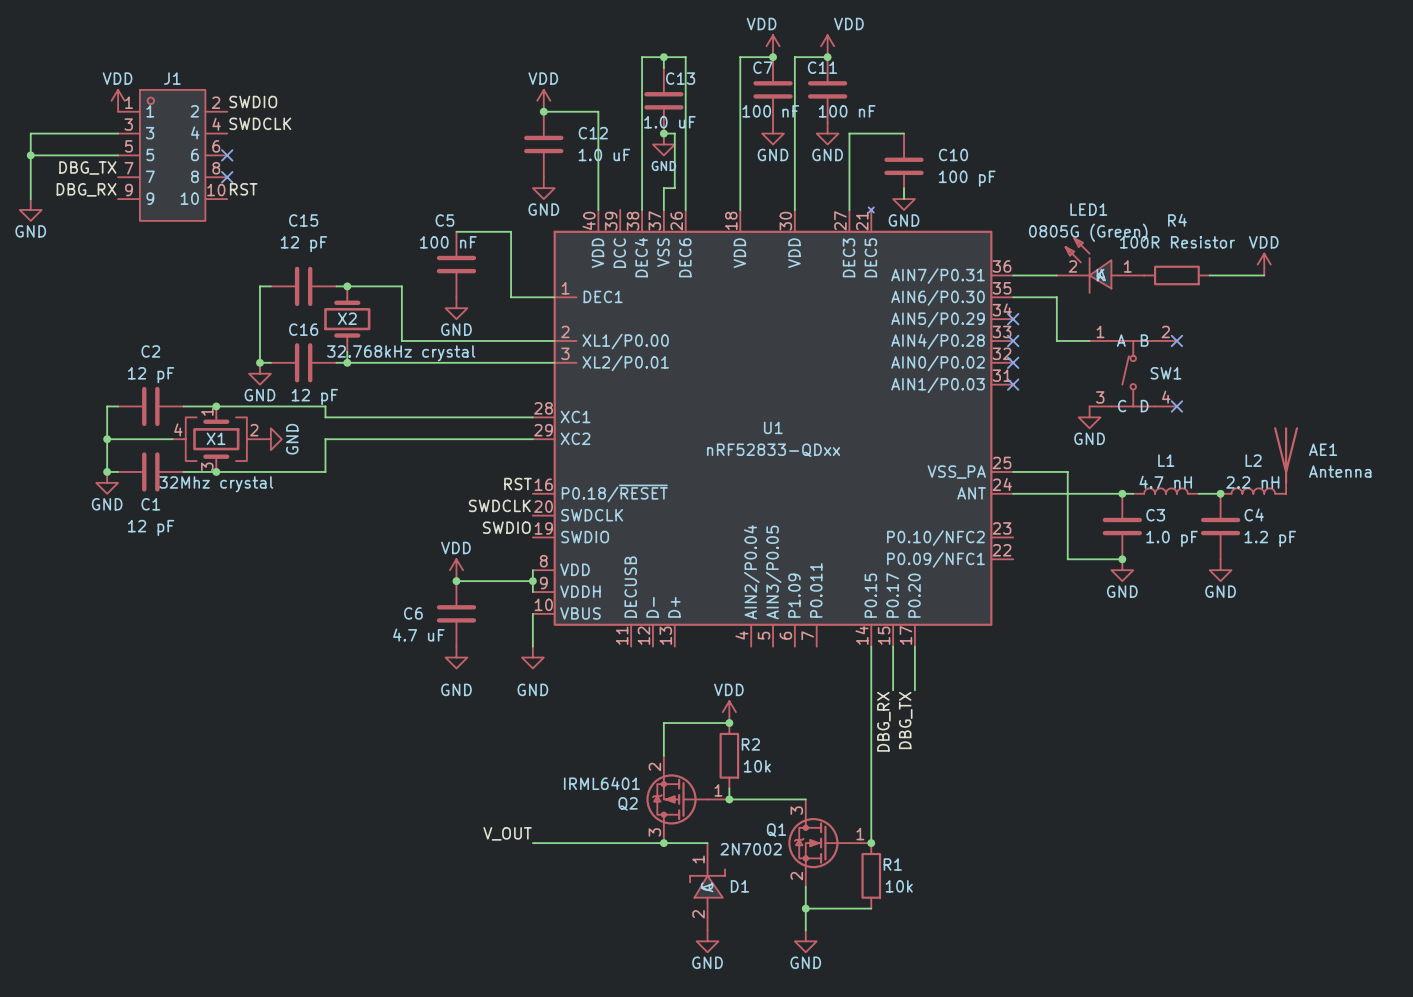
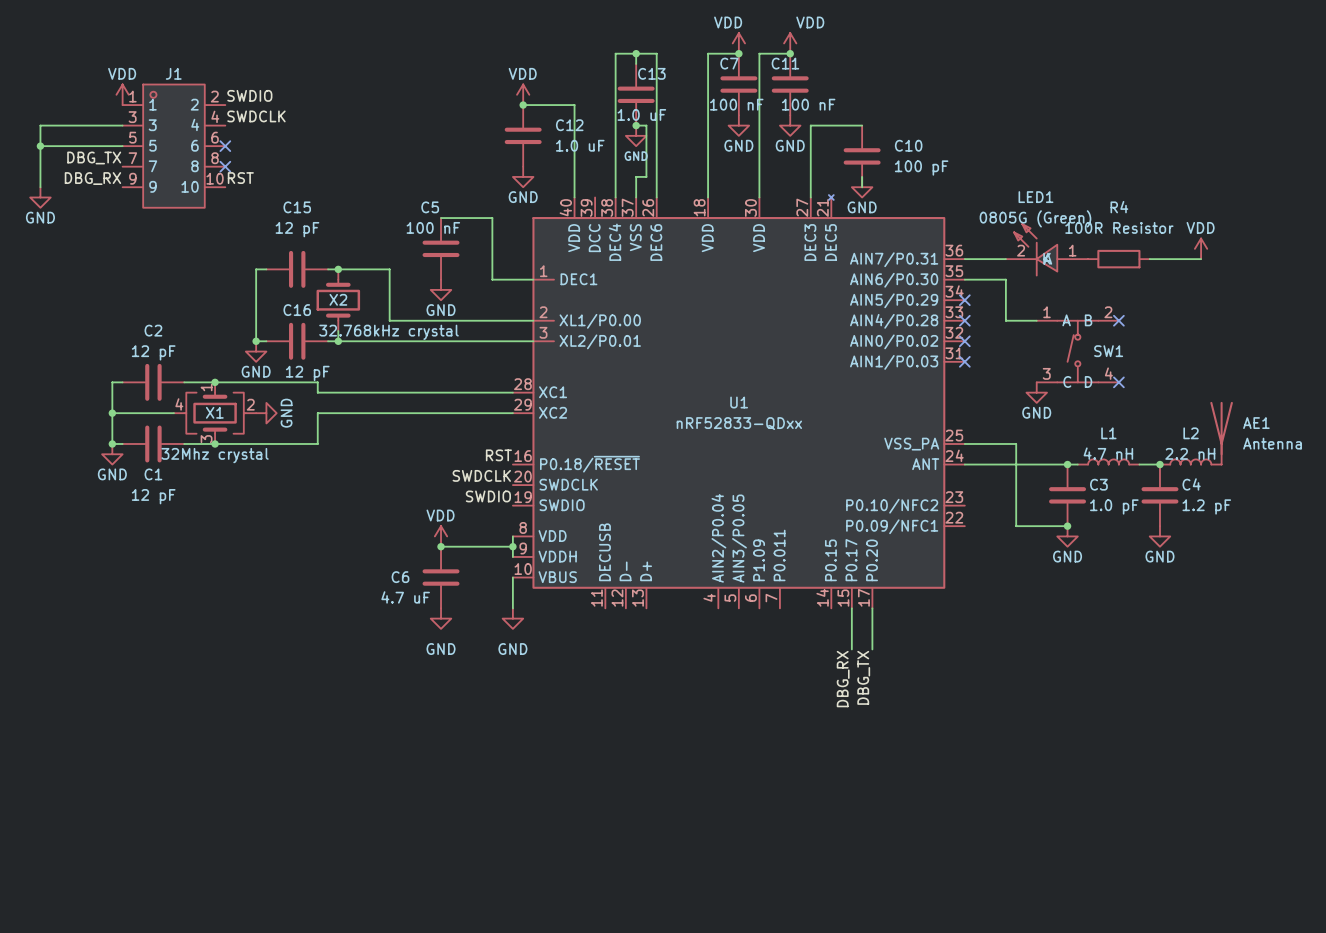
wire: (871, 646) (871, 843) -> none
power symbol: VDD (729, 712) -> none
wire: (729, 723) (663, 723) (663, 755) -> none
junction: (729, 723) -> none
R2: 10k (729, 755) -> none
wire: (729, 788) (729, 799) (805, 799) -> none
Q2: IRML6401 (687, 799) -> none
junction: (729, 799) -> none
label: V_OUT (507, 833) -> none
wire: (532, 843) (707, 843) -> none
junction: (663, 843) -> none
Q1: 2N7002 (829, 843) -> none
junction: (871, 843) -> none
R1: 10k (871, 875) -> none
D1: (707, 886) -> none
wire: (805, 886) (805, 930) -> none
wire: (805, 908) (871, 908) -> none
junction: (805, 908) -> none
power symbol: GND (707, 941) -> none
power symbol: GND (805, 941) -> none

